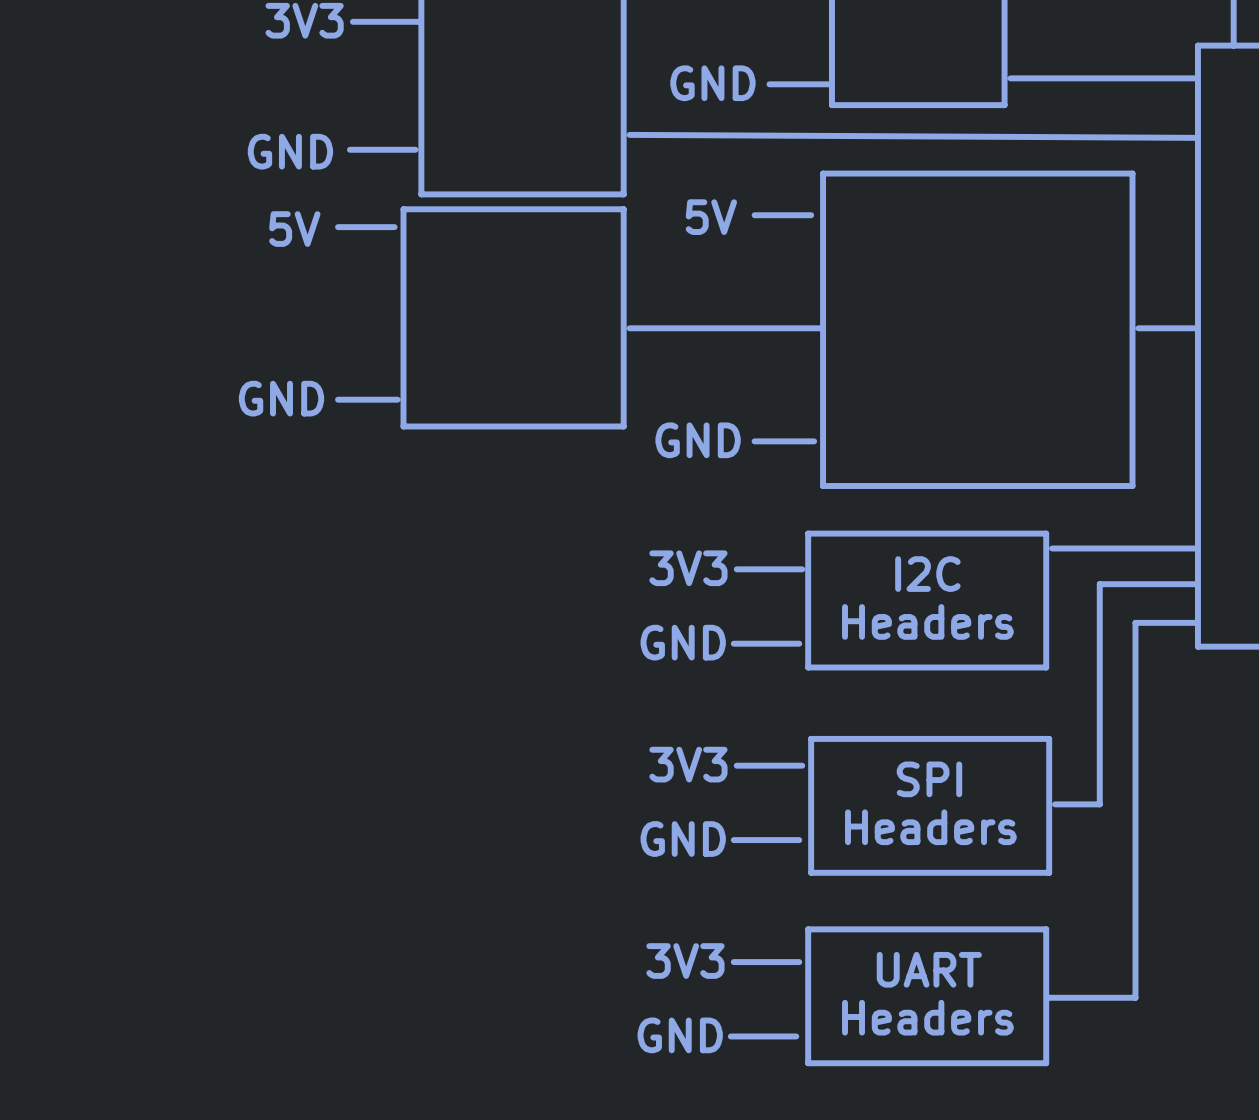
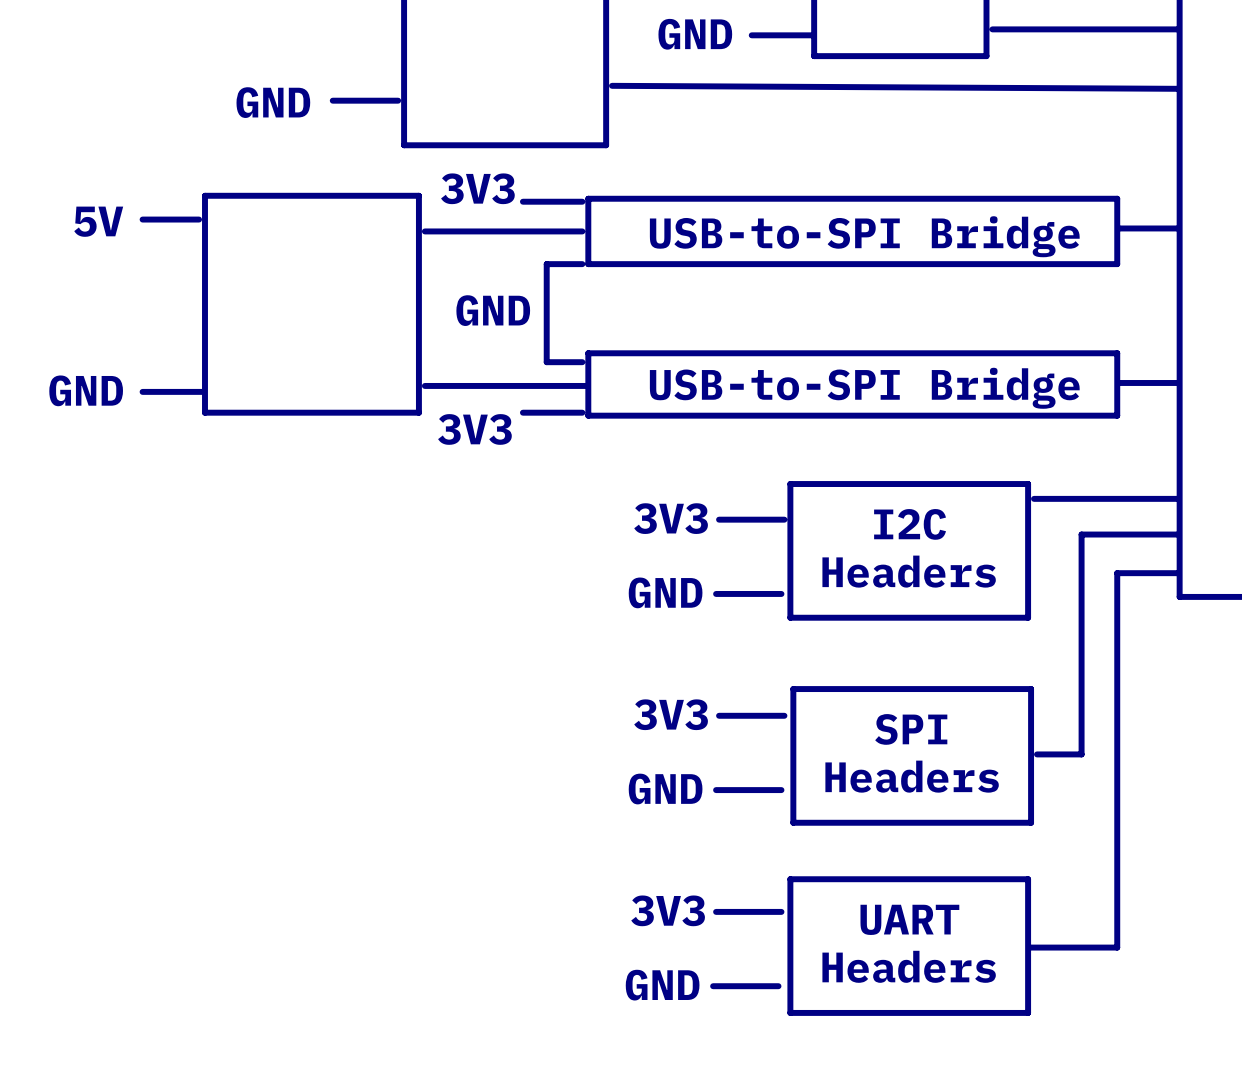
line: (823, 173) (1132, 173) (1132, 485) (823, 485) (823, 173) -> none
line: (403, 209) (623, 209) (623, 426) (403, 426) (403, 209) -> none
line: (754, 215) (811, 215) -> none
text: 5V (711, 217) -> none
line: (338, 227) (394, 227) -> (142, 219) (199, 219)
text position: 5V (294, 229) -> 5V (98, 221)
text: none -> 3V3 (477, 188)
line: none -> (204, 195) (418, 195) (418, 412) (204, 412) (204, 195)
line: none -> (588, 198) (1117, 198) (1117, 264) (588, 264) (588, 198)
line: none -> (522, 201) (582, 201)
line: none -> (424, 231) (582, 231)
text: none -> USB-to-SPI Bridge (864, 236)
line: none -> (582, 264) (546, 264) (546, 362) (582, 362)
line: (629, 328) (820, 328) -> none
line: (1138, 328) (1194, 328) -> (1120, 228) (1176, 228)
text: none -> GND (493, 310)
text: GND (281, 398) -> none
line: (338, 399) (397, 399) -> (142, 391) (202, 391)
line: none -> (588, 353) (588, 415) (1117, 415) (1117, 353) (588, 353)
line: none -> (1120, 382) (1176, 382)
line: none -> (424, 385) (585, 385)
text: none -> USB-to-SPI Bridge (864, 388)
text: none -> GND (86, 390)
text: GND (698, 440) -> none
line: (754, 441) (814, 441) -> (522, 412) (582, 412)
text: none -> 3V3 (474, 429)

